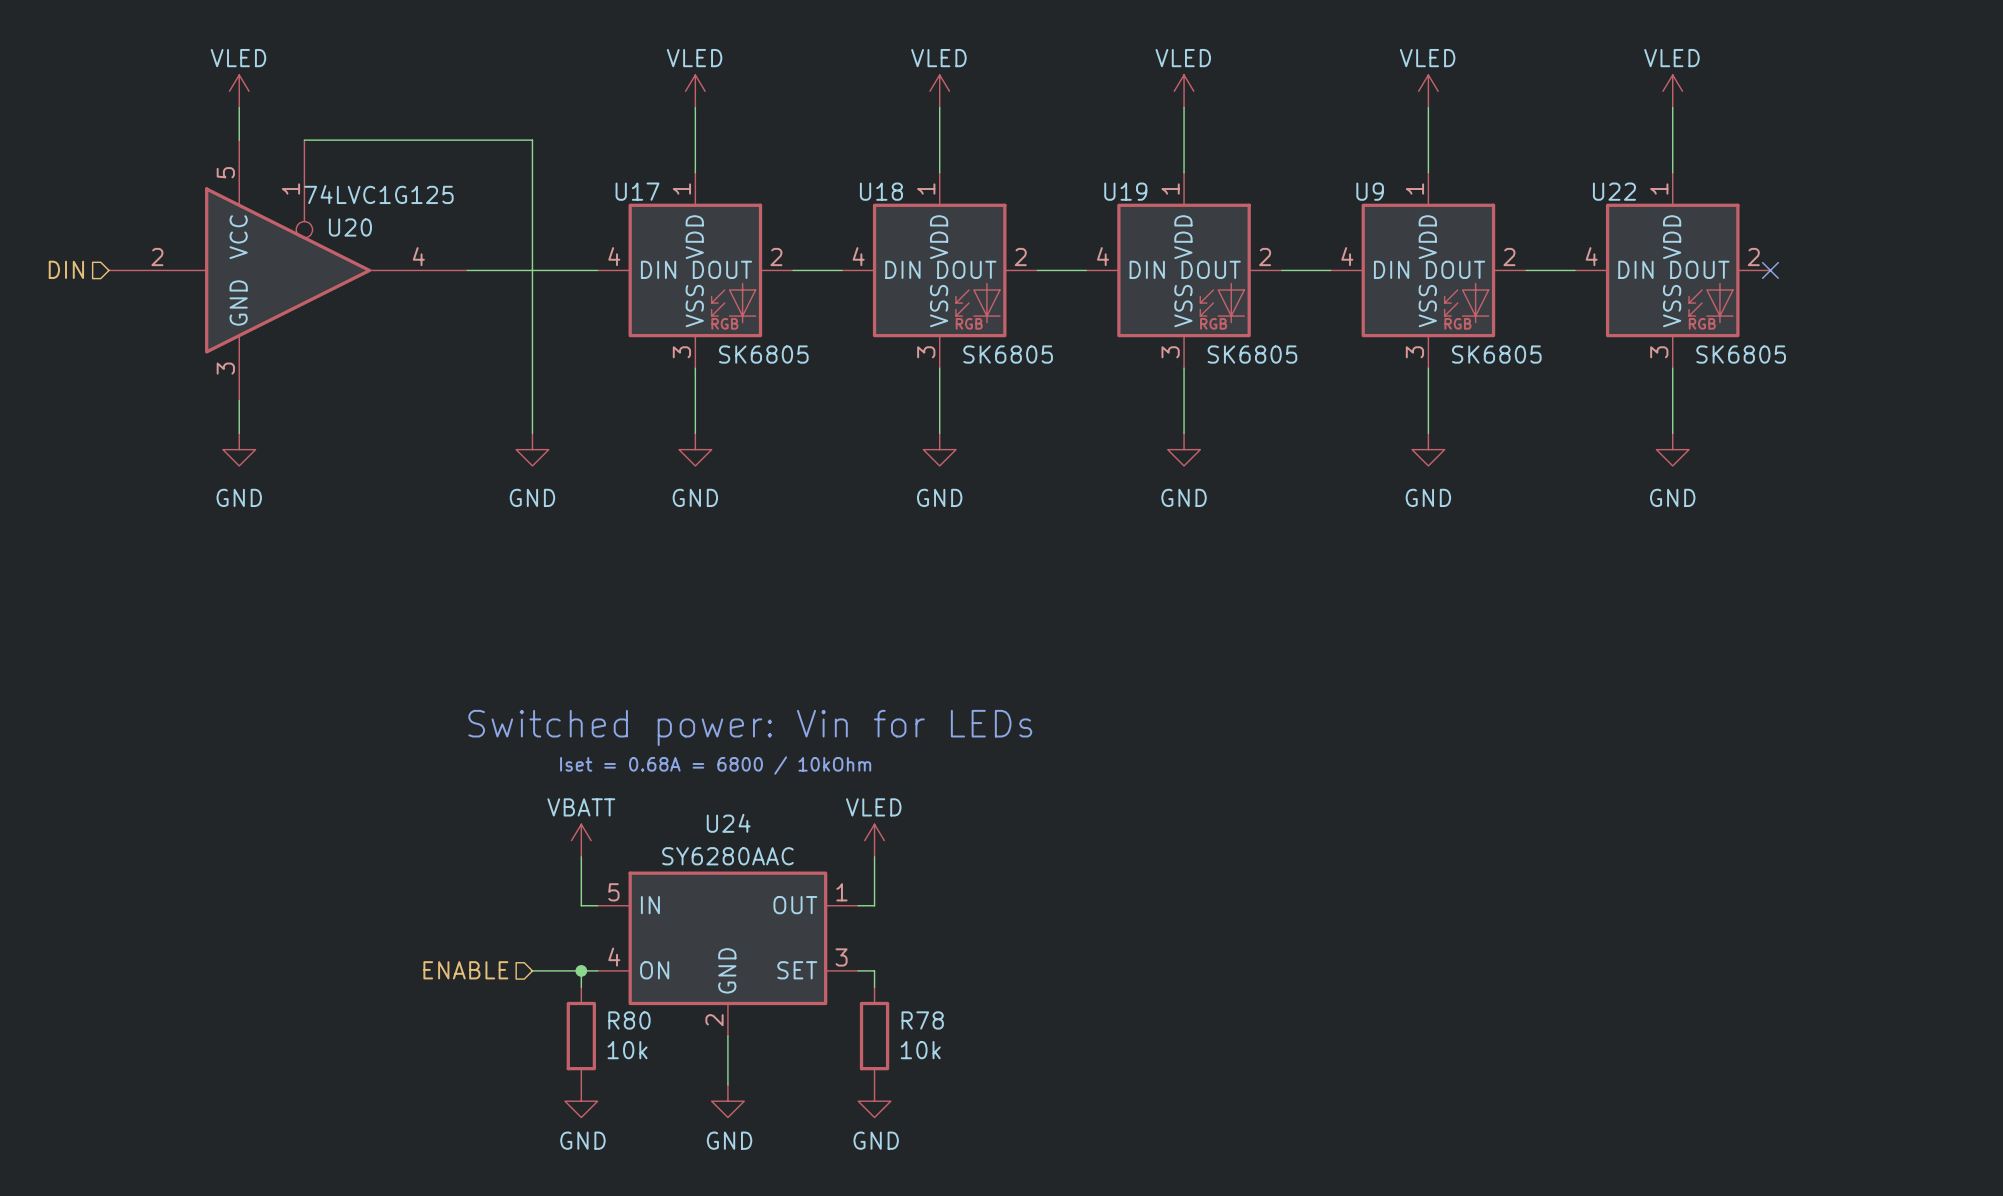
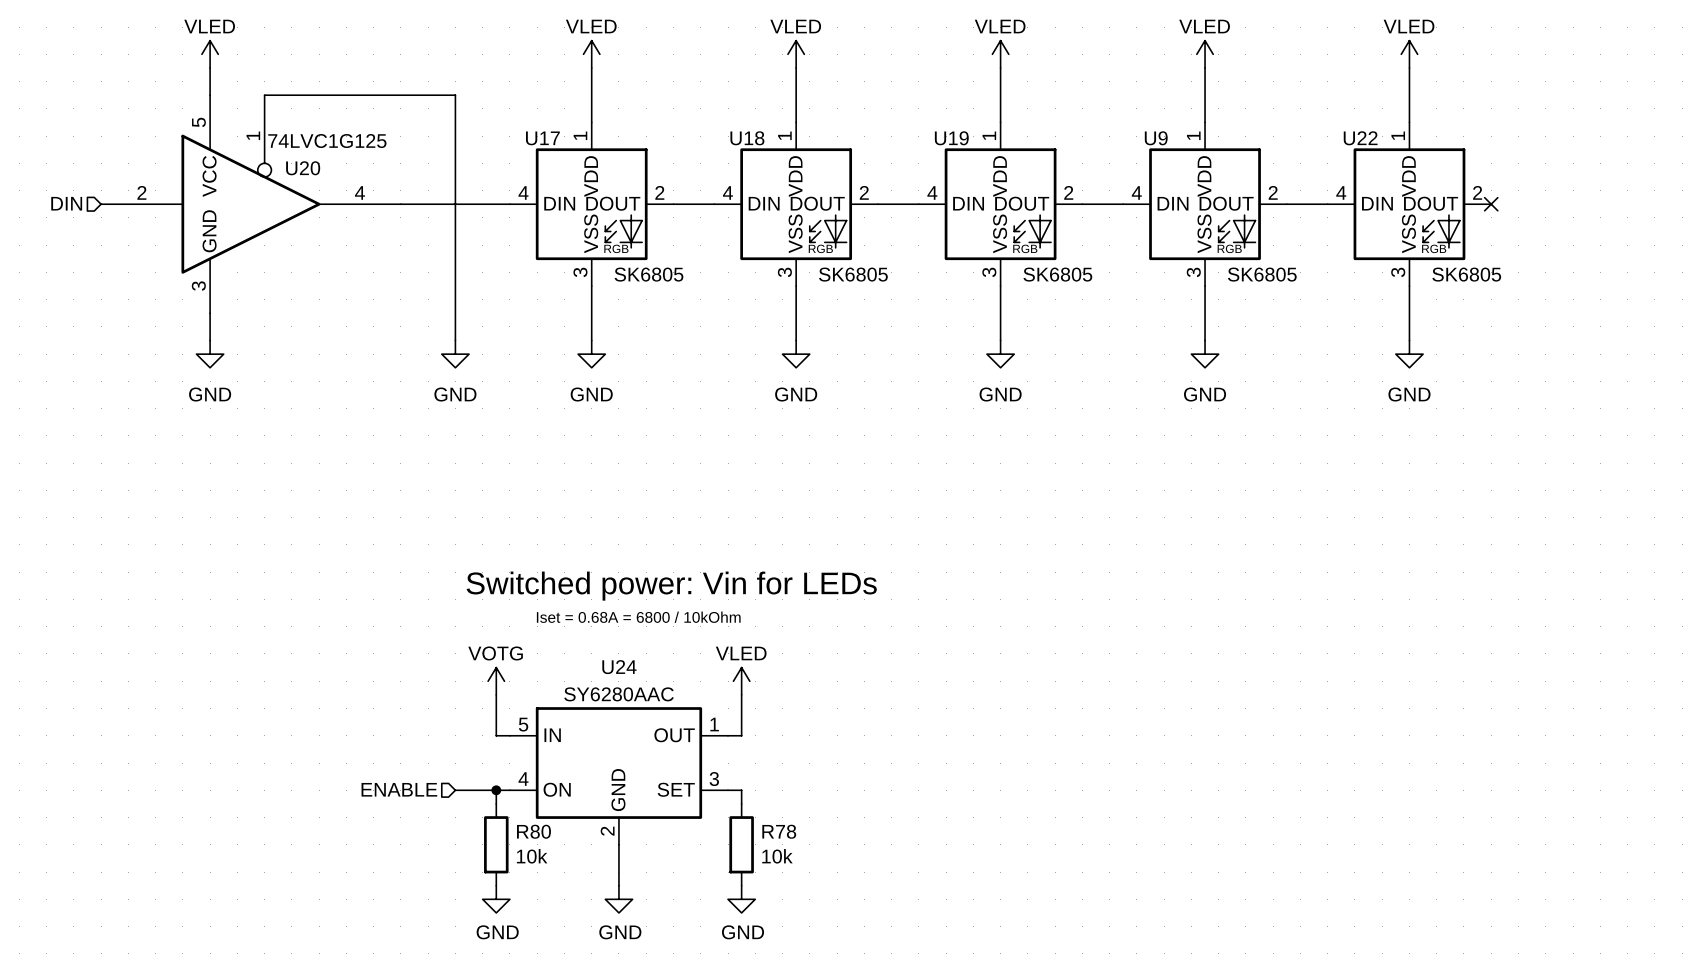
power symbol: VBATT (581, 840) -> VOTG (496, 681)

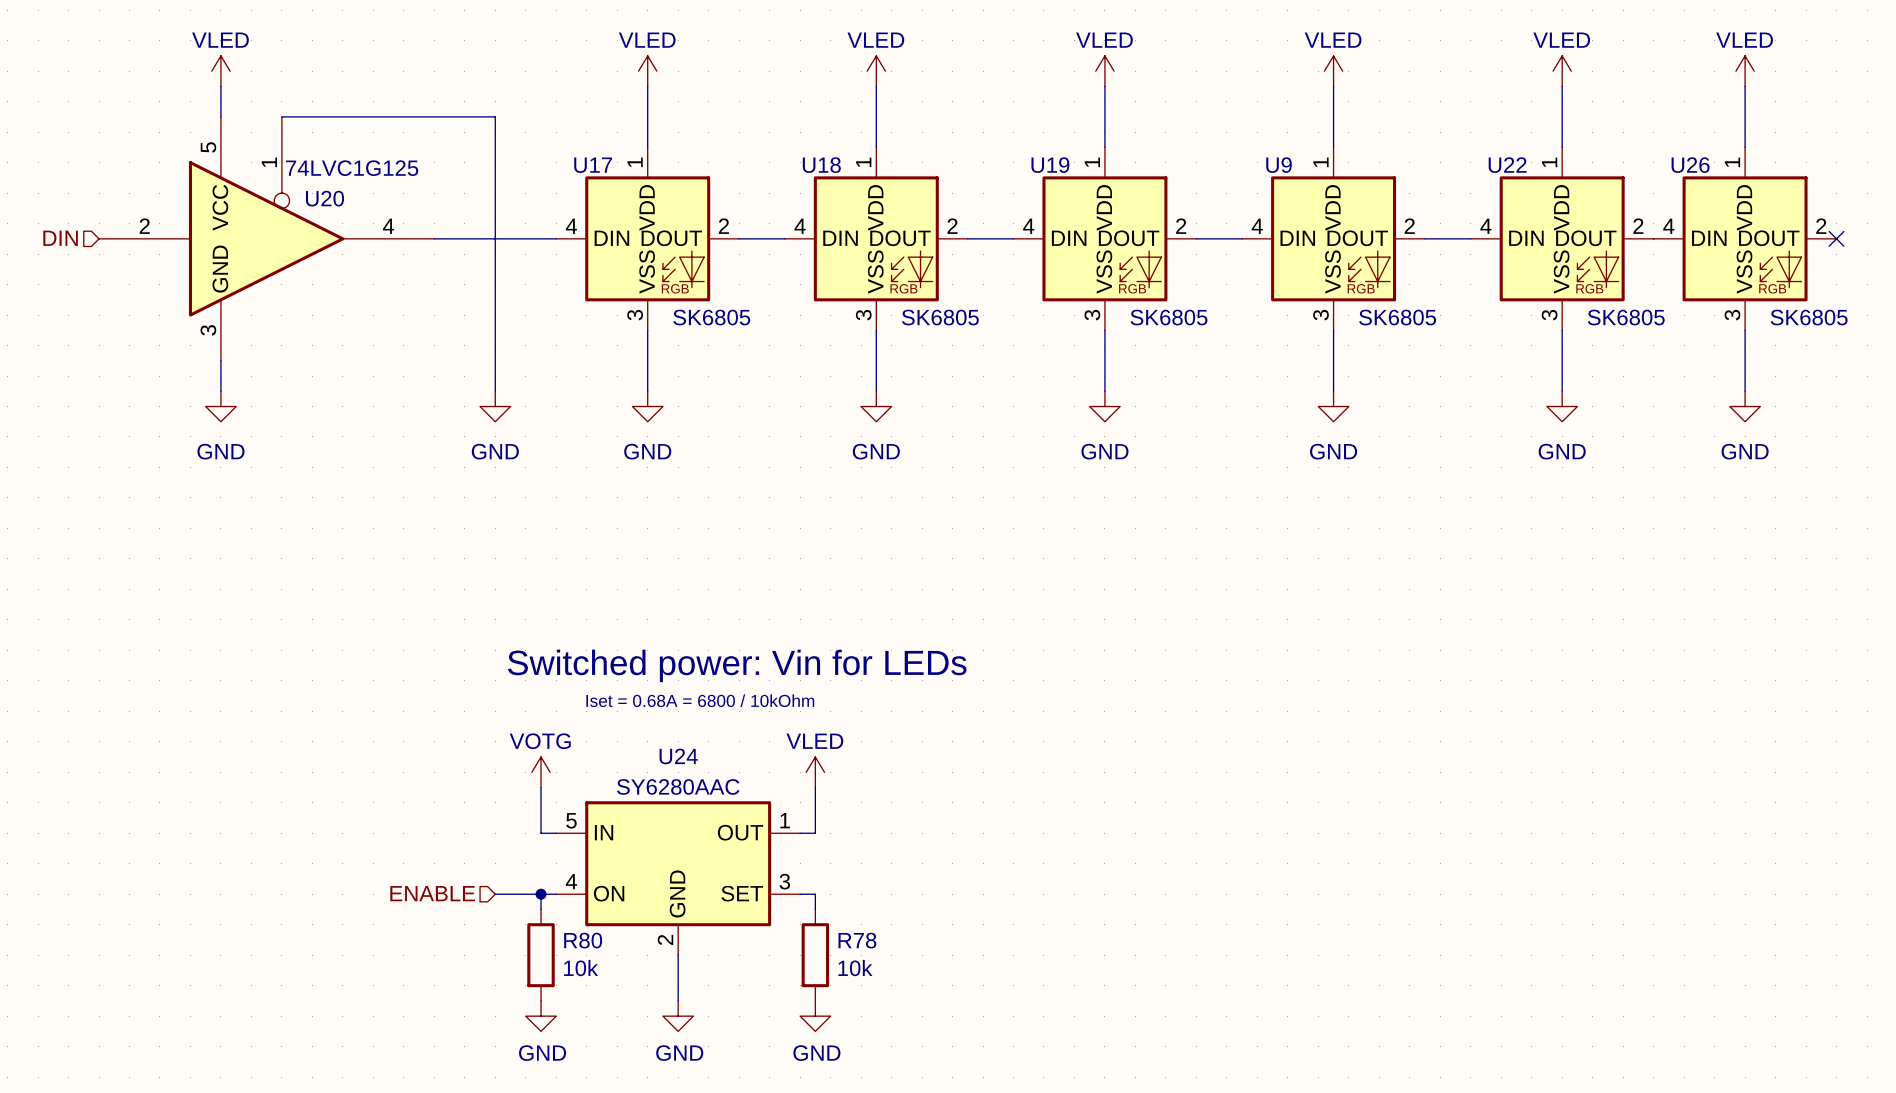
power symbol: none -> VLED (1745, 71)
wire: none -> (1745, 86) (1745, 147)
no-connect mark: (1491, 204) -> none
U26: none -> SK6805 (1745, 238)
no-connect mark: none -> (1836, 238)
wire: none -> (1745, 330) (1745, 391)
power symbol: none -> GND (1745, 406)

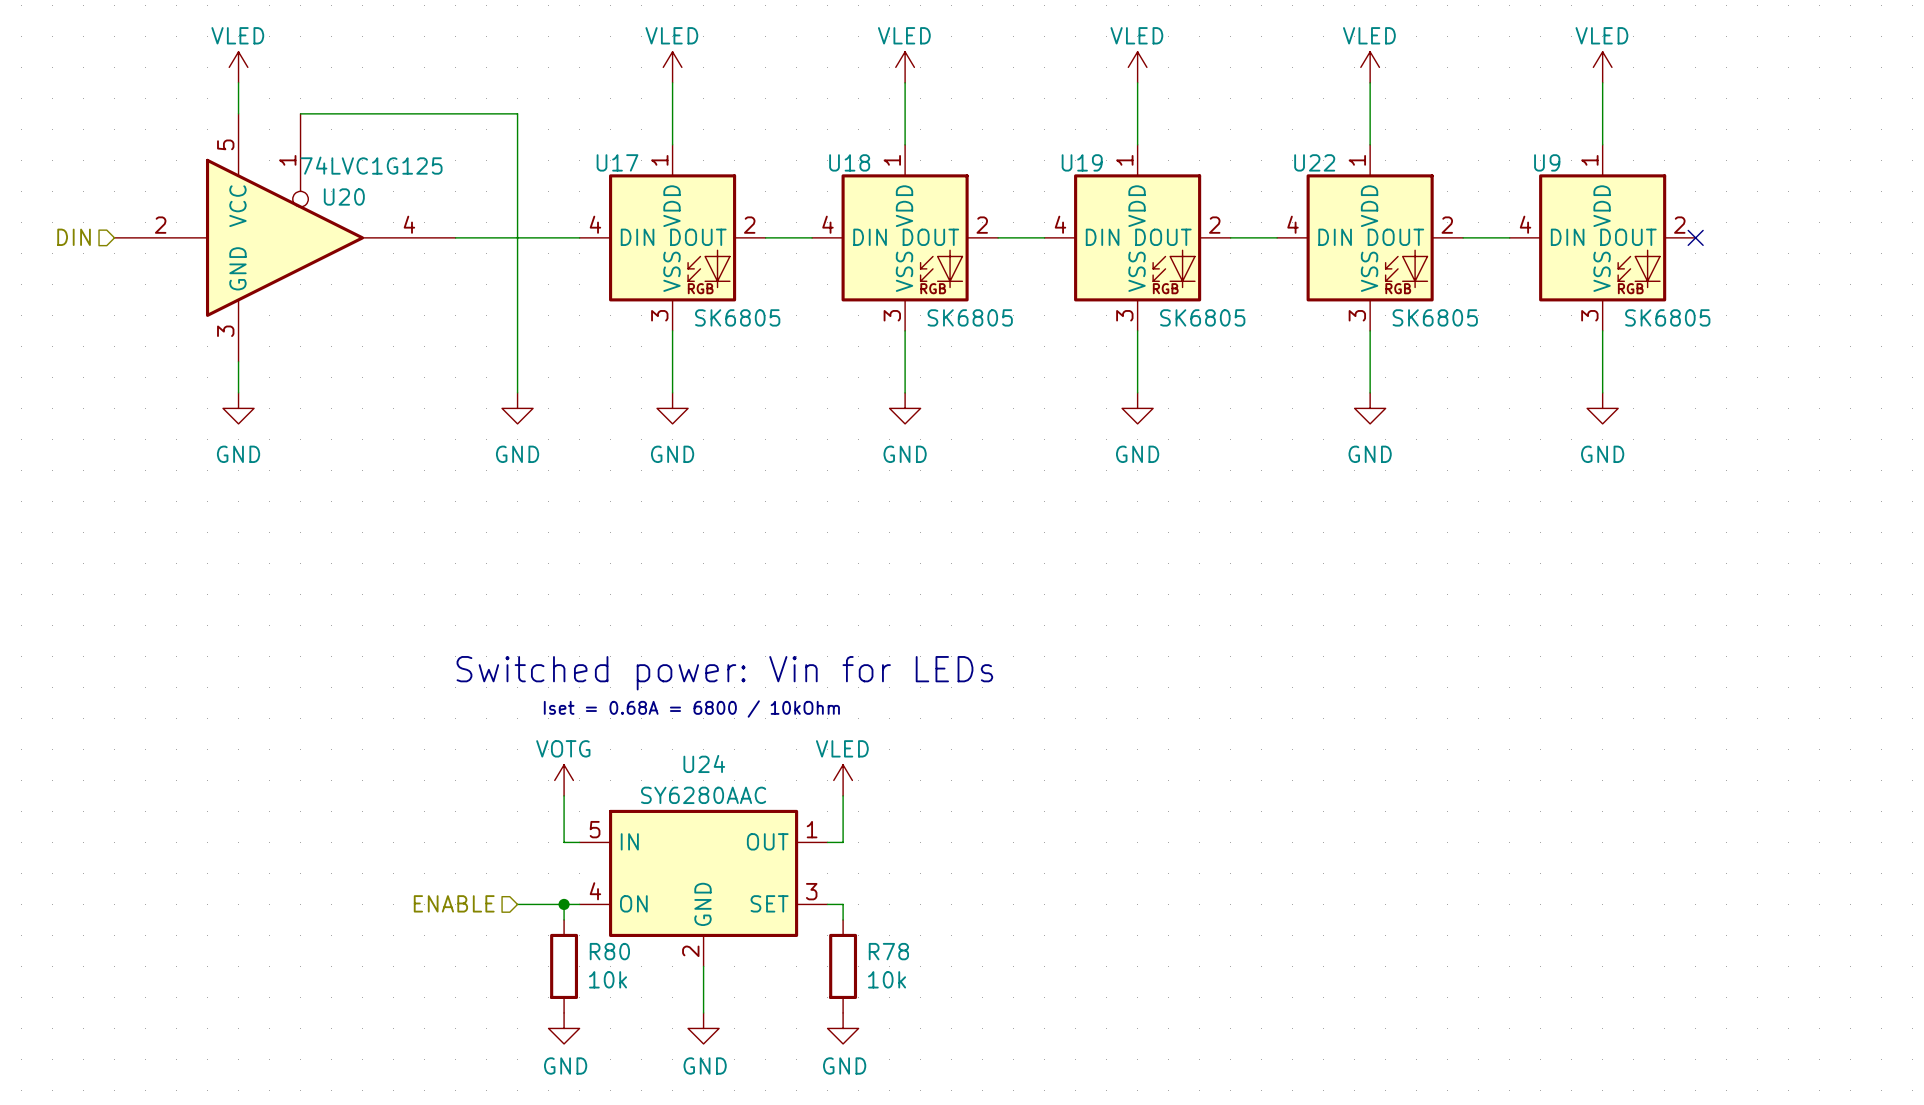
power symbol: VLED (1745, 71) -> none
wire: (1745, 86) (1745, 147) -> none
U9 name: U9 (1279, 165) -> U22 (1314, 162)
U22 name: U22 (1507, 165) -> U9 (1547, 162)
no-connect mark: none -> (1695, 237)
U26: SK6805 (1745, 238) -> none
no-connect mark: (1836, 238) -> none
wire: (1745, 330) (1745, 391) -> none
power symbol: GND (1745, 406) -> none

